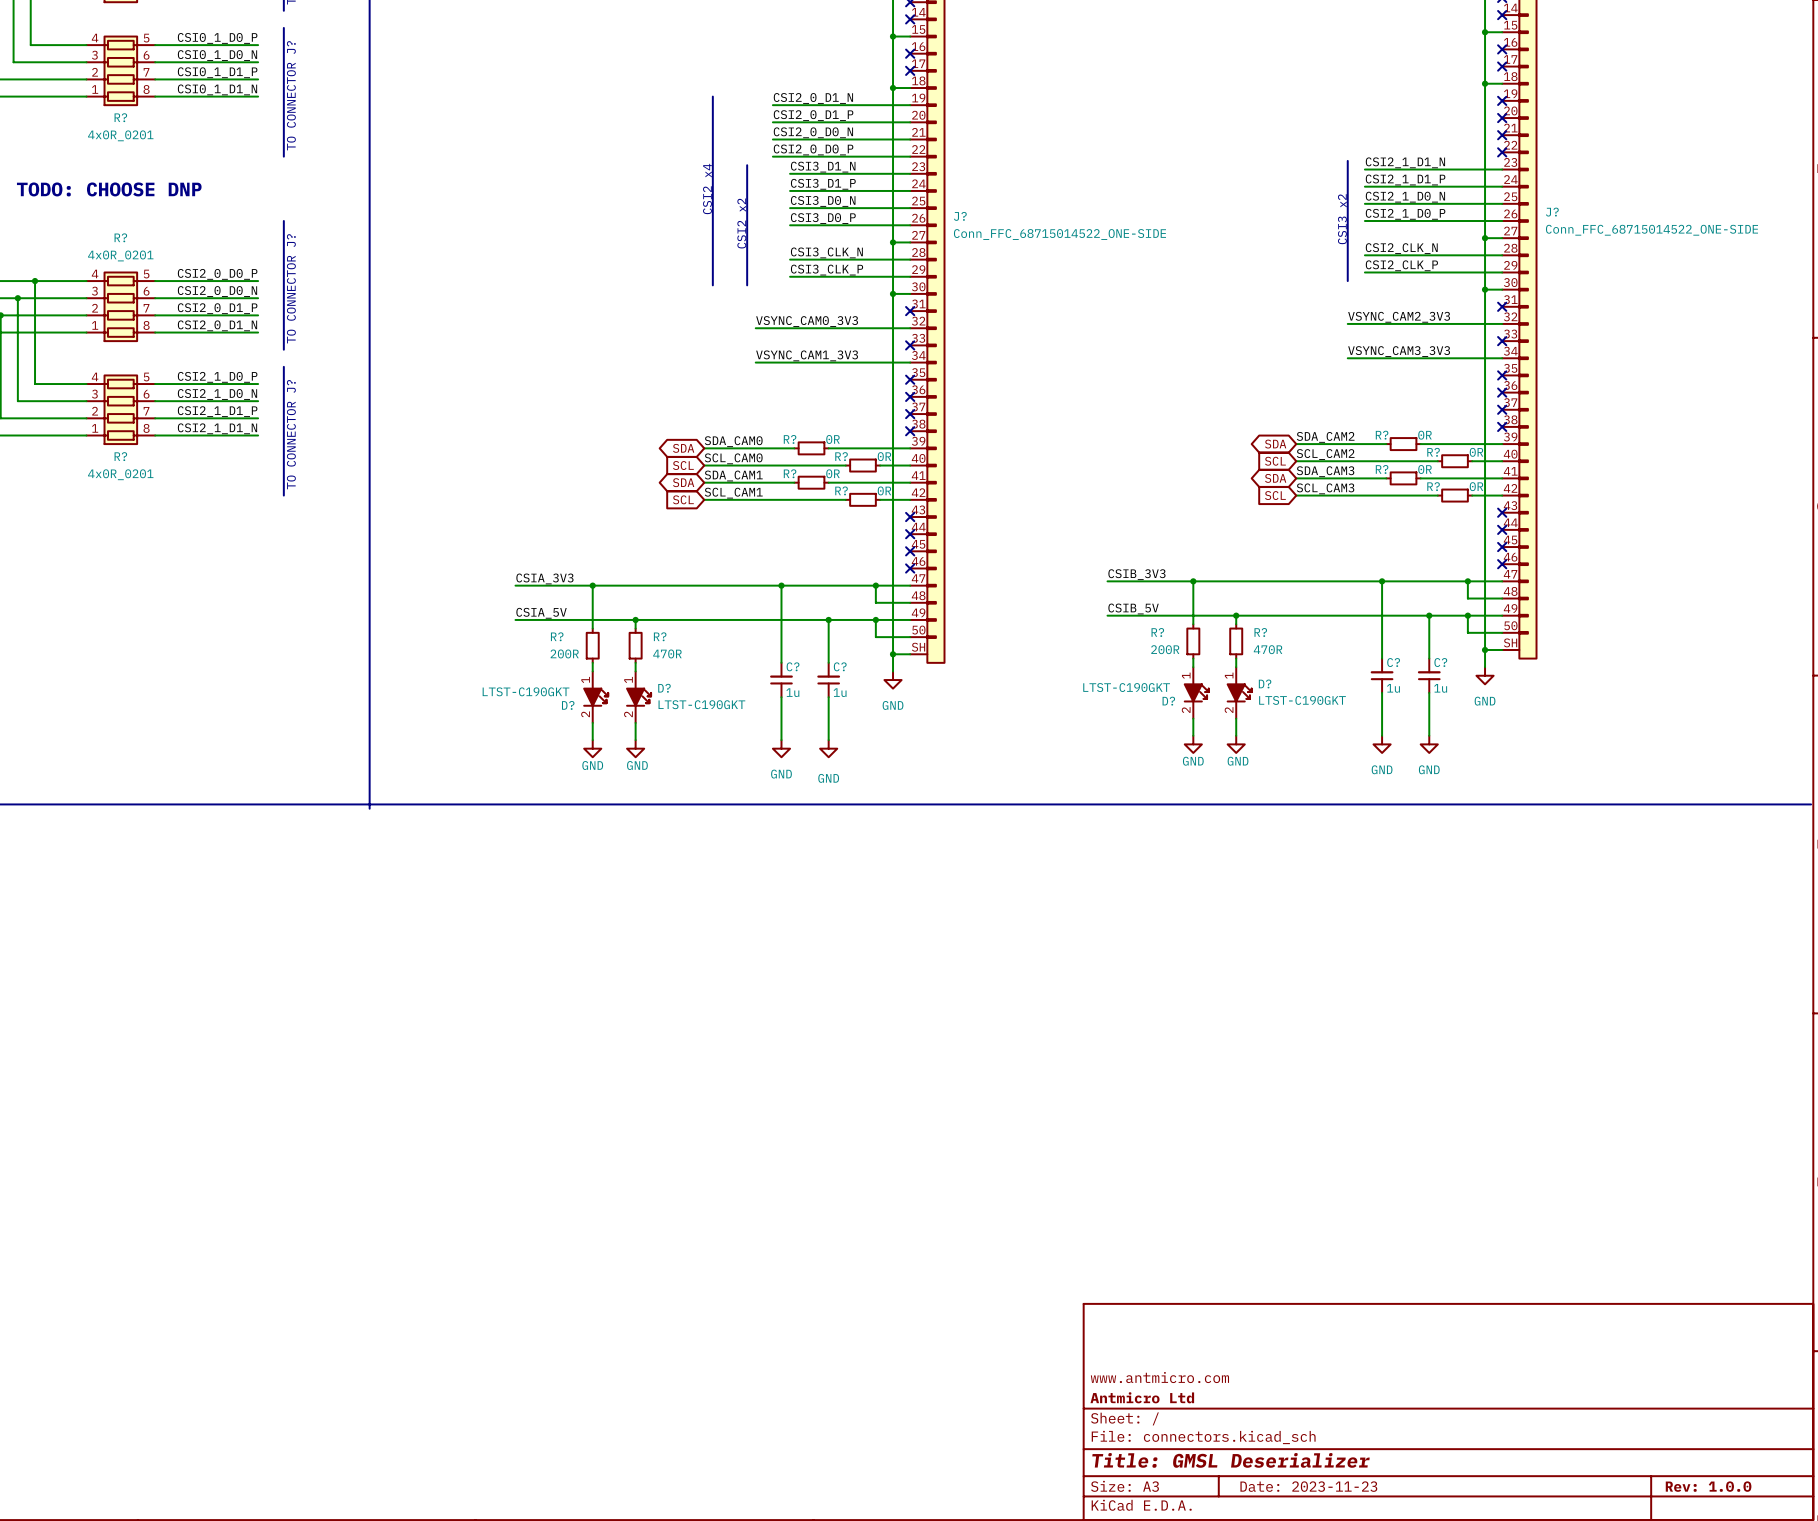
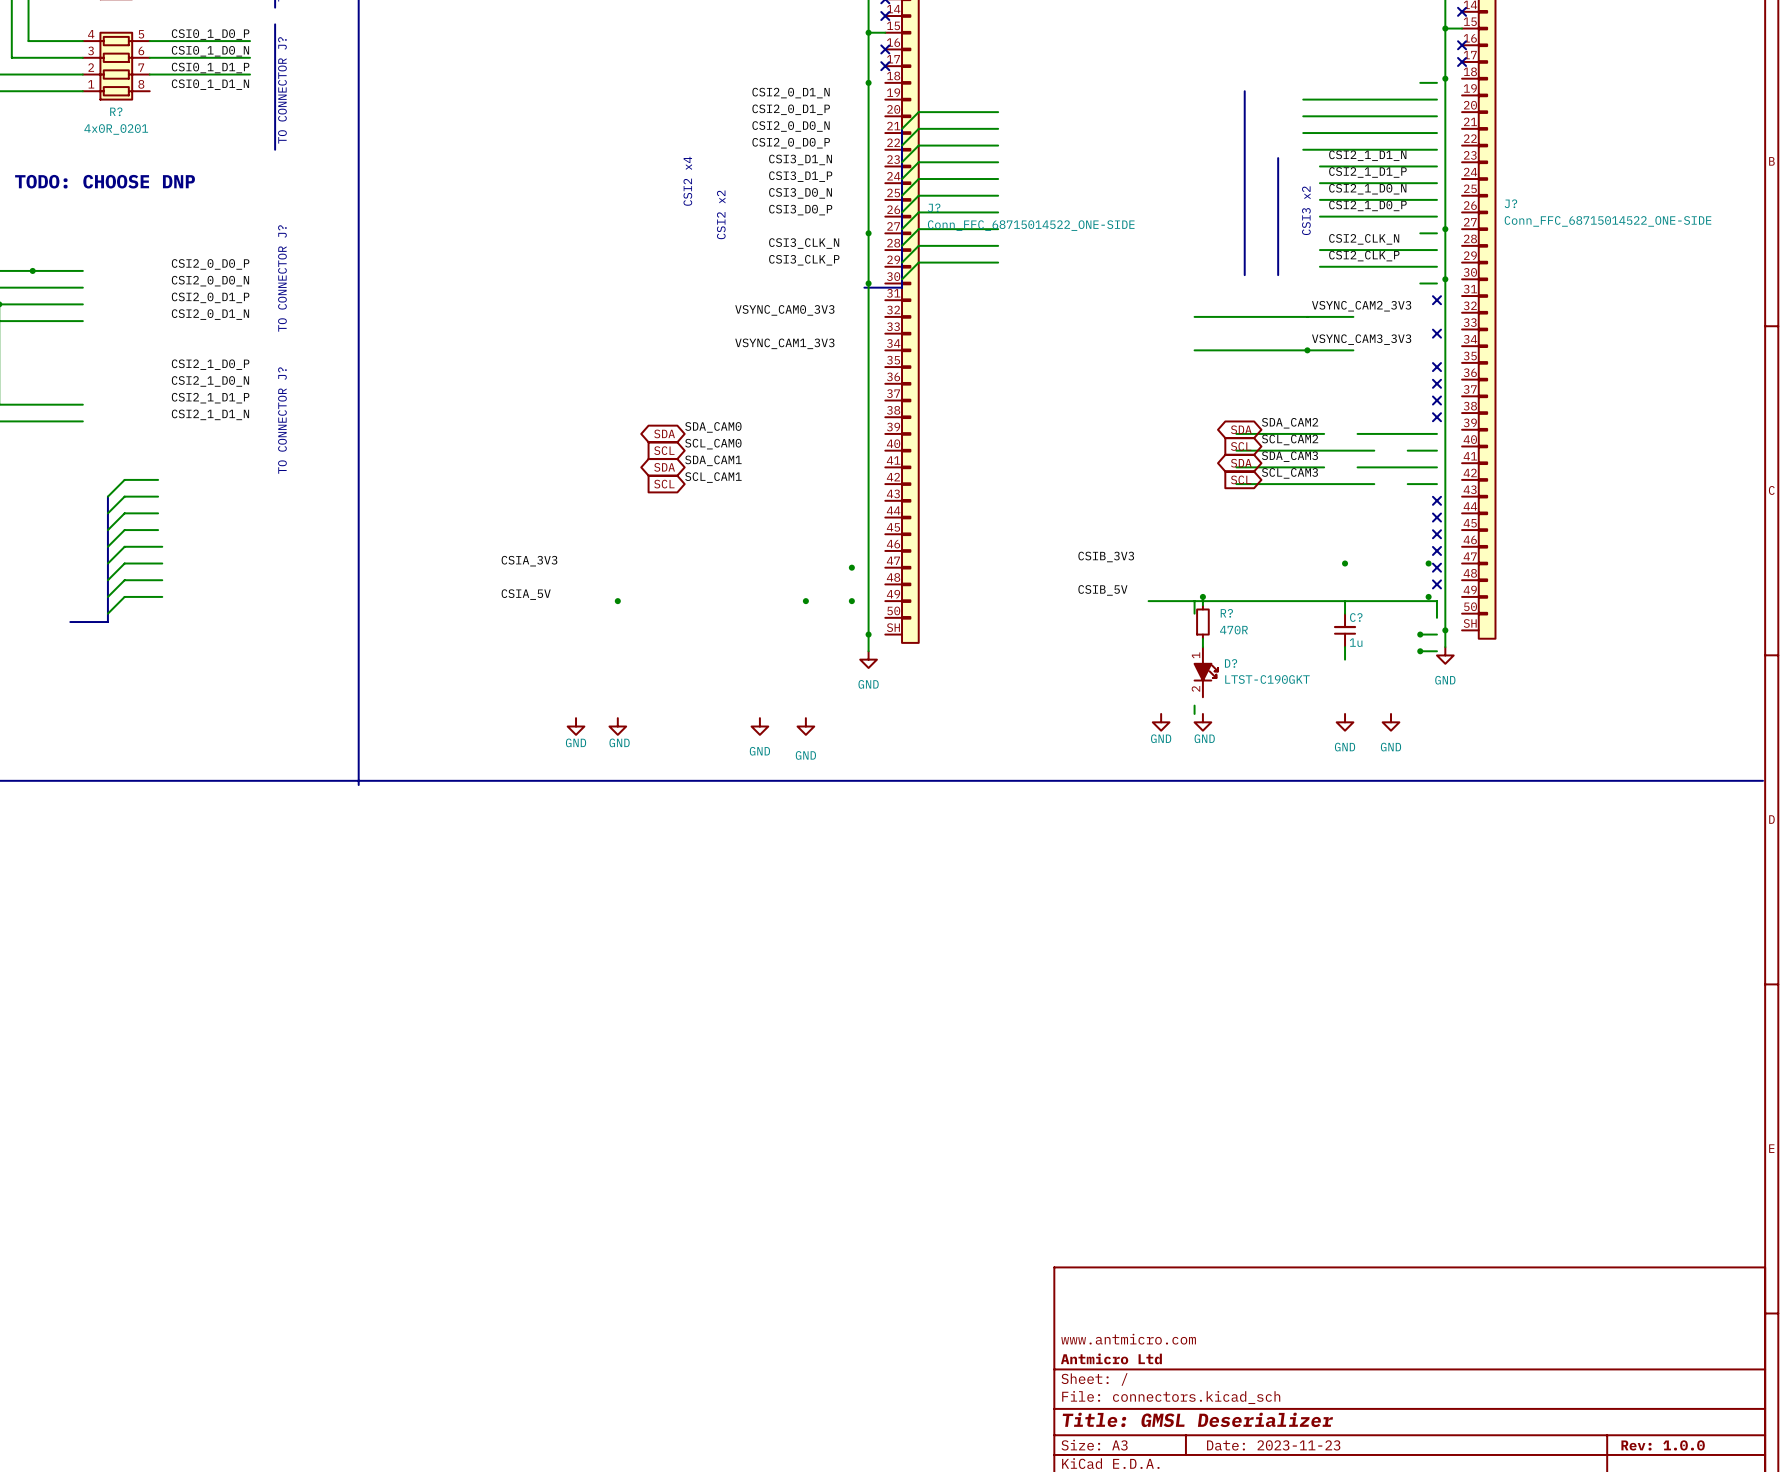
wire: (1485, 83) (1502, 83) -> (1420, 82) (1436, 82)
wire: (893, 88) (910, 88) -> none
wire: (155, 96) (258, 96) -> none
line: (712, 96) (712, 285) -> none
line: none -> (1244, 91) (1244, 275)
no-connect mark: (1502, 100) -> none
wire: (772, 105) (910, 105) -> none
wire: none -> (998, 112) (918, 112) (902, 128)
no-connect mark: (1502, 118) -> none
wire: (772, 122) (910, 122) -> none
bus: none -> (902, 128) (902, 287) (864, 287)
wire: none -> (998, 128) (918, 128) (902, 145)
no-connect mark: (1502, 135) -> none
wire: (772, 139) (910, 139) -> none
wire: none -> (998, 145) (918, 145) (902, 162)
no-connect mark: (1502, 152) -> none
wire: (772, 156) (910, 156) -> none
line: (1347, 160) (1347, 281) -> (1278, 158) (1278, 275)
line: (747, 165) (747, 285) -> none
wire: none -> (998, 162) (918, 162) (902, 179)
wire: (1364, 169) (1502, 169) -> (1303, 133) (1436, 133)
wire: (790, 173) (910, 173) -> none
wire: none -> (1319, 166) (1436, 166)
wire: none -> (998, 179) (918, 179) (902, 195)
wire: (1364, 186) (1502, 186) -> (1303, 149) (1436, 149)
wire: (790, 190) (910, 190) -> none
wire: none -> (1319, 183) (1436, 183)
wire: none -> (998, 195) (918, 195) (902, 212)
wire: (1364, 203) (1502, 203) -> (1303, 116) (1436, 116)
wire: (790, 208) (910, 208) -> none
wire: none -> (1319, 199) (1436, 199)
line: (283, 221) (283, 349) -> none
wire: none -> (998, 212) (918, 212) (902, 229)
wire: (1364, 221) (1502, 221) -> (1303, 99) (1436, 99)
wire: (790, 225) (910, 225) -> none
wire: none -> (1319, 216) (1436, 216)
wire: none -> (998, 229) (918, 229) (902, 245)
wire: (1485, 238) (1502, 238) -> (1420, 233) (1436, 233)
wire: (893, 242) (910, 242) -> none
wire: none -> (998, 245) (918, 245) (902, 262)
wire: (1364, 255) (1502, 255) -> none
wire: (790, 259) (910, 259) -> none
wire: none -> (1319, 250) (1436, 250)
wire: none -> (998, 262) (918, 262) (902, 279)
wire: (1364, 272) (1502, 272) -> none
wire: (790, 276) (910, 276) -> none
wire: none -> (1319, 266) (1436, 266)
wire: (35, 281) (35, 384) (86, 384) -> none
wire: (155, 281) (258, 281) -> none
wire: (1485, 289) (1502, 289) -> (1420, 283) (1436, 283)
wire: (893, 293) (910, 293) -> none
wire: (17, 298) (17, 401) (86, 401) -> none
junction: (17, 298) -> none
wire: (155, 298) (258, 298) -> none
R?: (120, 306) -> none
no-connect mark: (1502, 306) -> none
no-connect mark: (910, 311) -> none
no-connect mark: none -> (1436, 300)
wire: (155, 315) (258, 315) -> none
wire: (1347, 323) (1502, 323) -> none
wire: (755, 328) (910, 328) -> none
wire: none -> (1194, 316) (1353, 316)
wire: (155, 332) (258, 332) -> none
no-connect mark: (1502, 341) -> none
no-connect mark: (910, 345) -> none
no-connect mark: none -> (1436, 333)
wire: (1347, 358) (1502, 358) -> none
wire: (755, 362) (910, 362) -> none
wire: none -> (1194, 350) (1353, 350)
junction: none -> (1307, 350)
line: (283, 366) (283, 495) -> none
no-connect mark: (1502, 375) -> none
no-connect mark: (910, 379) -> none
no-connect mark: none -> (1436, 367)
wire: (155, 384) (258, 384) -> none
no-connect mark: (1502, 392) -> none
no-connect mark: (910, 396) -> none
no-connect mark: none -> (1436, 383)
wire: (155, 401) (258, 401) -> none
R?: (120, 409) -> none
no-connect mark: (1502, 409) -> none
no-connect mark: (910, 414) -> none
no-connect mark: none -> (1436, 400)
wire: (155, 418) (258, 418) -> none
no-connect mark: (1502, 426) -> none
no-connect mark: (910, 431) -> none
no-connect mark: none -> (1436, 417)
wire: (155, 435) (258, 435) -> none
wire: (1296, 444) (1386, 444) -> (1236, 433) (1324, 433)
R?: (1403, 444) -> none
wire: (1420, 444) (1502, 444) -> (1357, 433) (1436, 433)
wire: (704, 448) (794, 448) -> none
R?: (811, 448) -> none
wire: (828, 448) (910, 448) -> none
wire: (1296, 461) (1437, 461) -> (1236, 450) (1374, 450)
R?: (1455, 461) -> none
wire: (1472, 461) (1502, 461) -> (1407, 450) (1436, 450)
wire: (704, 465) (845, 465) -> none
R?: (862, 465) -> none
wire: (880, 465) (910, 465) -> none
wire: (1296, 478) (1386, 478) -> (1236, 467) (1324, 467)
R?: (1403, 478) -> none
wire: (1420, 478) (1502, 478) -> (1357, 467) (1436, 467)
wire: (704, 482) (794, 482) -> none
R?: (811, 482) -> none
wire: (828, 482) (910, 482) -> none
wire: none -> (158, 479) (124, 479) (107, 496)
wire: (1296, 495) (1437, 495) -> (1236, 484) (1374, 484)
R?: (1455, 495) -> none
wire: (1472, 495) (1502, 495) -> (1407, 484) (1436, 484)
wire: (704, 499) (845, 499) -> none
R?: (862, 499) -> none
wire: (880, 499) (910, 499) -> none
bus: none -> (107, 496) (107, 622) (70, 622)
wire: none -> (158, 496) (124, 496) (107, 513)
no-connect mark: (1502, 512) -> none
no-connect mark: (910, 517) -> none
no-connect mark: none -> (1436, 500)
wire: none -> (158, 513) (124, 513) (107, 530)
no-connect mark: (1502, 529) -> none
no-connect mark: (910, 534) -> none
no-connect mark: none -> (1436, 517)
wire: none -> (158, 530) (124, 530) (107, 546)
no-connect mark: (1502, 547) -> none
no-connect mark: (910, 551) -> none
no-connect mark: none -> (1436, 534)
wire: none -> (162, 546) (124, 546) (107, 563)
no-connect mark: (1502, 564) -> none
no-connect mark: (910, 568) -> none
no-connect mark: none -> (1436, 550)
wire: none -> (162, 563) (124, 563) (107, 580)
wire: (1107, 581) (1502, 581) -> none
wire: (1193, 581) (1193, 624) -> none
junction: (1193, 581) -> none
wire: (1382, 581) (1382, 619) -> none
wire: (1467, 581) (1467, 598) (1502, 598) -> none
wire: (515, 585) (910, 585) -> none
wire: (592, 585) (592, 628) -> none
junction: (592, 585) -> none
wire: (781, 585) (781, 662) -> none
junction: (781, 585) -> none
wire: (875, 585) (875, 602) (910, 602) -> none
no-connect mark: none -> (1436, 567)
wire: none -> (162, 580) (124, 580) (107, 596)
no-connect mark: none -> (1436, 584)
wire: none -> (162, 596) (124, 596) (107, 613)
wire: (1107, 615) (1502, 615) -> none
wire: (1429, 615) (1429, 658) -> none
junction: (1429, 615) -> none
wire: (1467, 615) (1467, 632) (1502, 632) -> none
wire: (515, 619) (910, 619) -> none
wire: (635, 619) (635, 628) -> none
wire: (828, 619) (828, 662) -> none
wire: (875, 619) (875, 637) (910, 637) -> none
wire: none -> (1148, 601) (1436, 601) (1436, 617)
wire: none -> (1194, 601) (1194, 613)
R?: (1193, 641) -> none
R?: (592, 645) -> none
R?: (635, 645) -> none
wire: (1485, 649) (1502, 649) -> (1420, 634) (1436, 634)
wire: (893, 654) (910, 654) -> none
junction: none -> (1420, 634)
wire: (1193, 658) (1193, 667) -> (1194, 705) (1194, 713)
wire: (592, 662) (592, 671) -> none
wire: (635, 662) (635, 671) -> none
wire: none -> (1420, 651) (1436, 651)
junction: none -> (1420, 651)
C? position: (1382, 675) -> (1345, 630)
C?: (1429, 675) -> none
C?: (781, 680) -> none
C?: (828, 680) -> none
D?: (1196, 692) -> none
wire: (1382, 692) (1382, 735) -> none
wire: (1429, 692) (1429, 735) -> none
D?: (596, 697) -> none
D?: (639, 697) -> none
wire: (781, 697) (781, 740) -> none
wire: (828, 697) (828, 740) -> none
wire: (1193, 718) (1193, 735) -> none
wire: (1236, 718) (1236, 735) -> none
wire: (592, 722) (592, 740) -> none
wire: (635, 722) (635, 740) -> none

